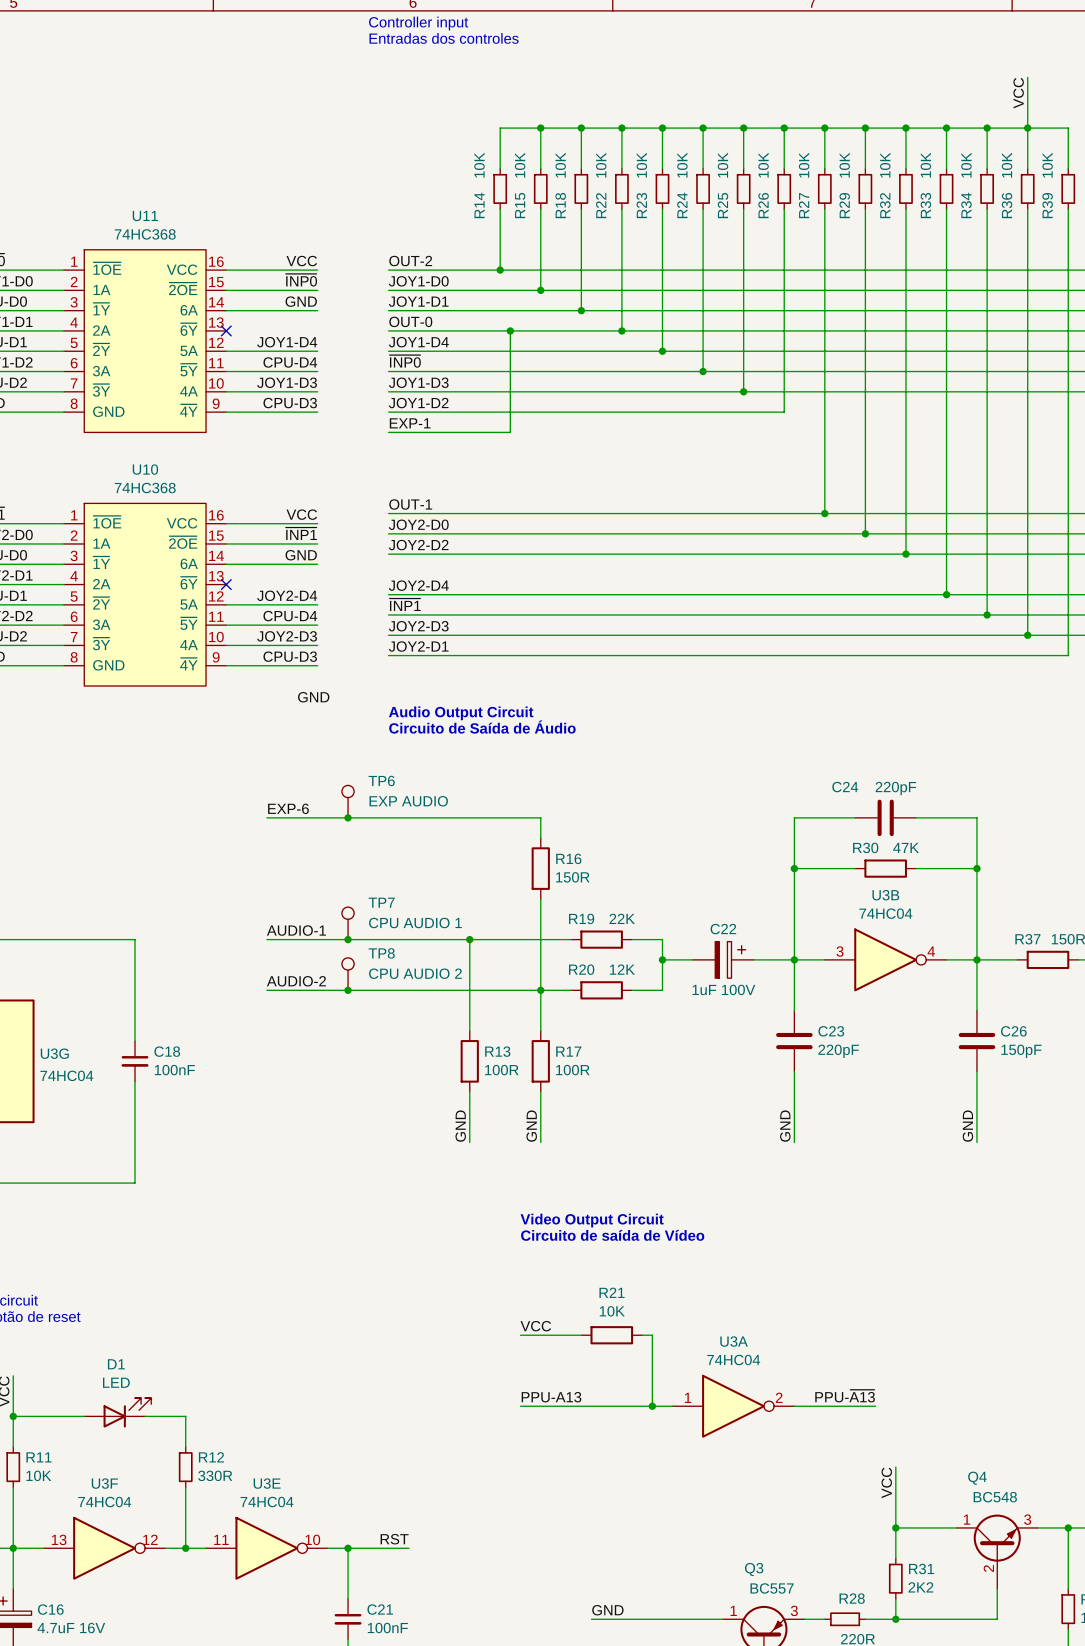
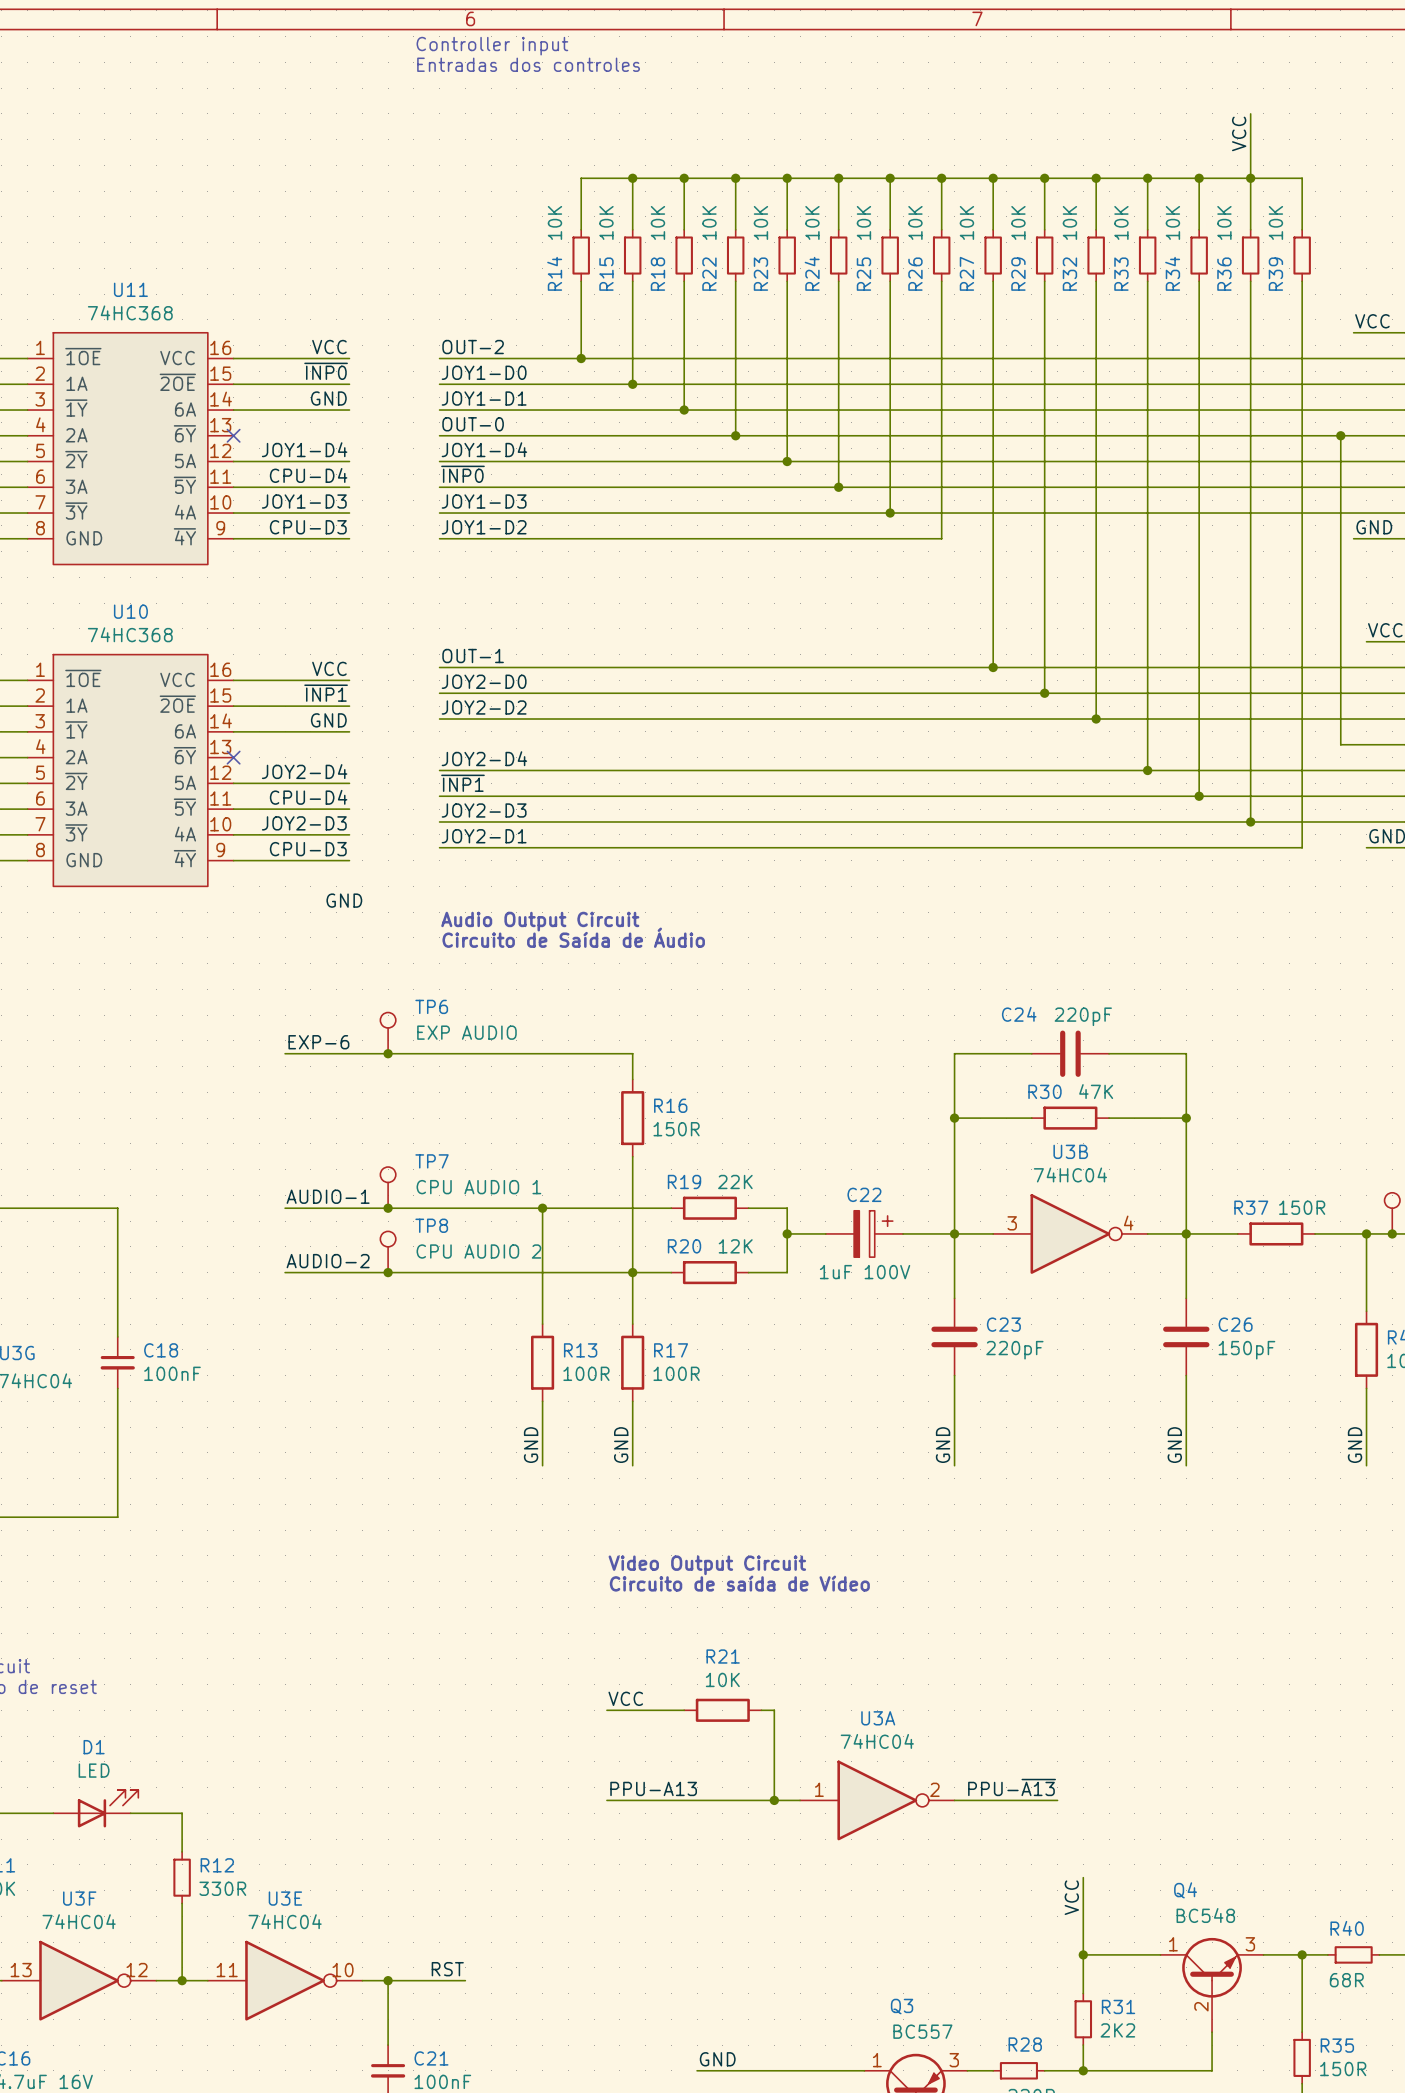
wire: (510, 330) (510, 432) (388, 432) -> none
junction: (510, 330) -> none
label: EXP-1 (410, 423) -> none

